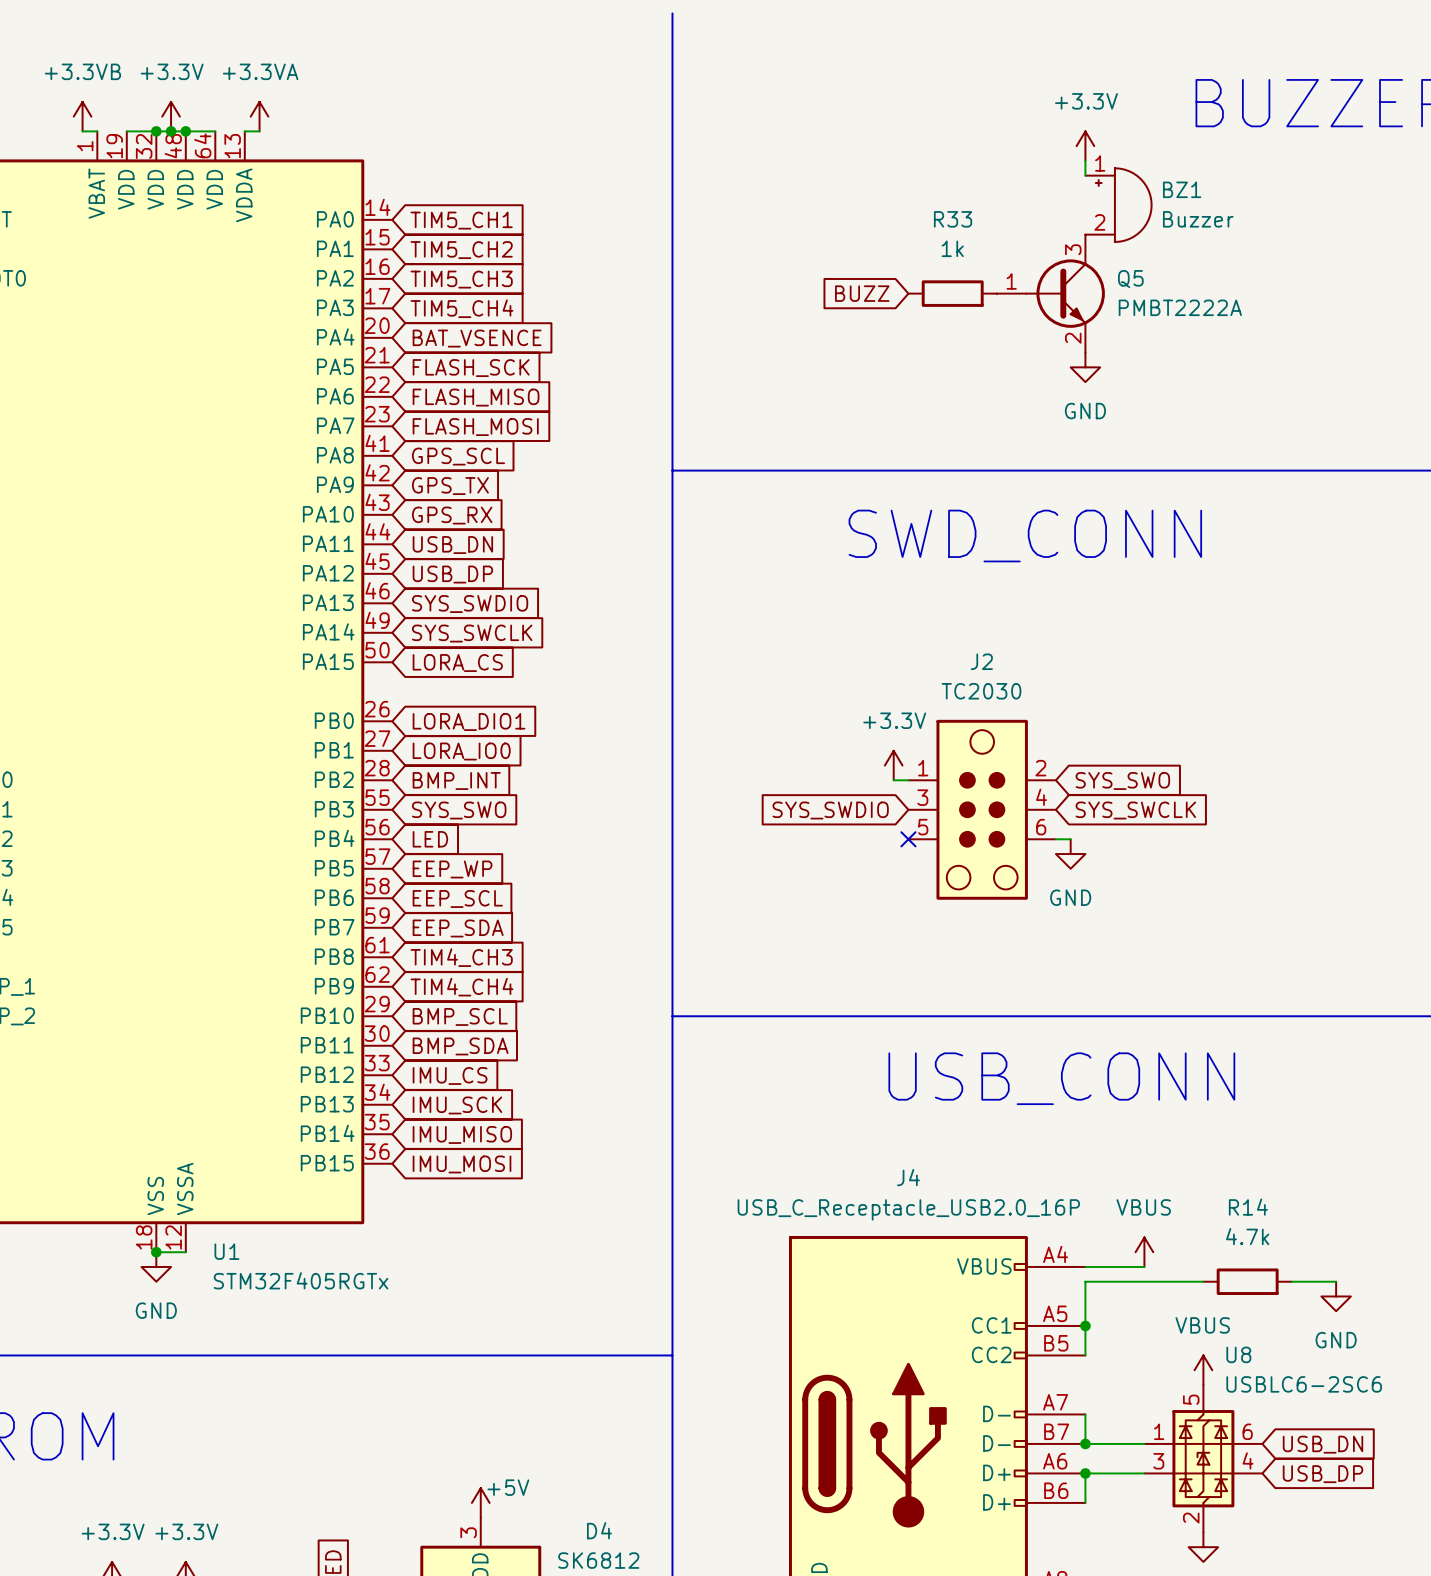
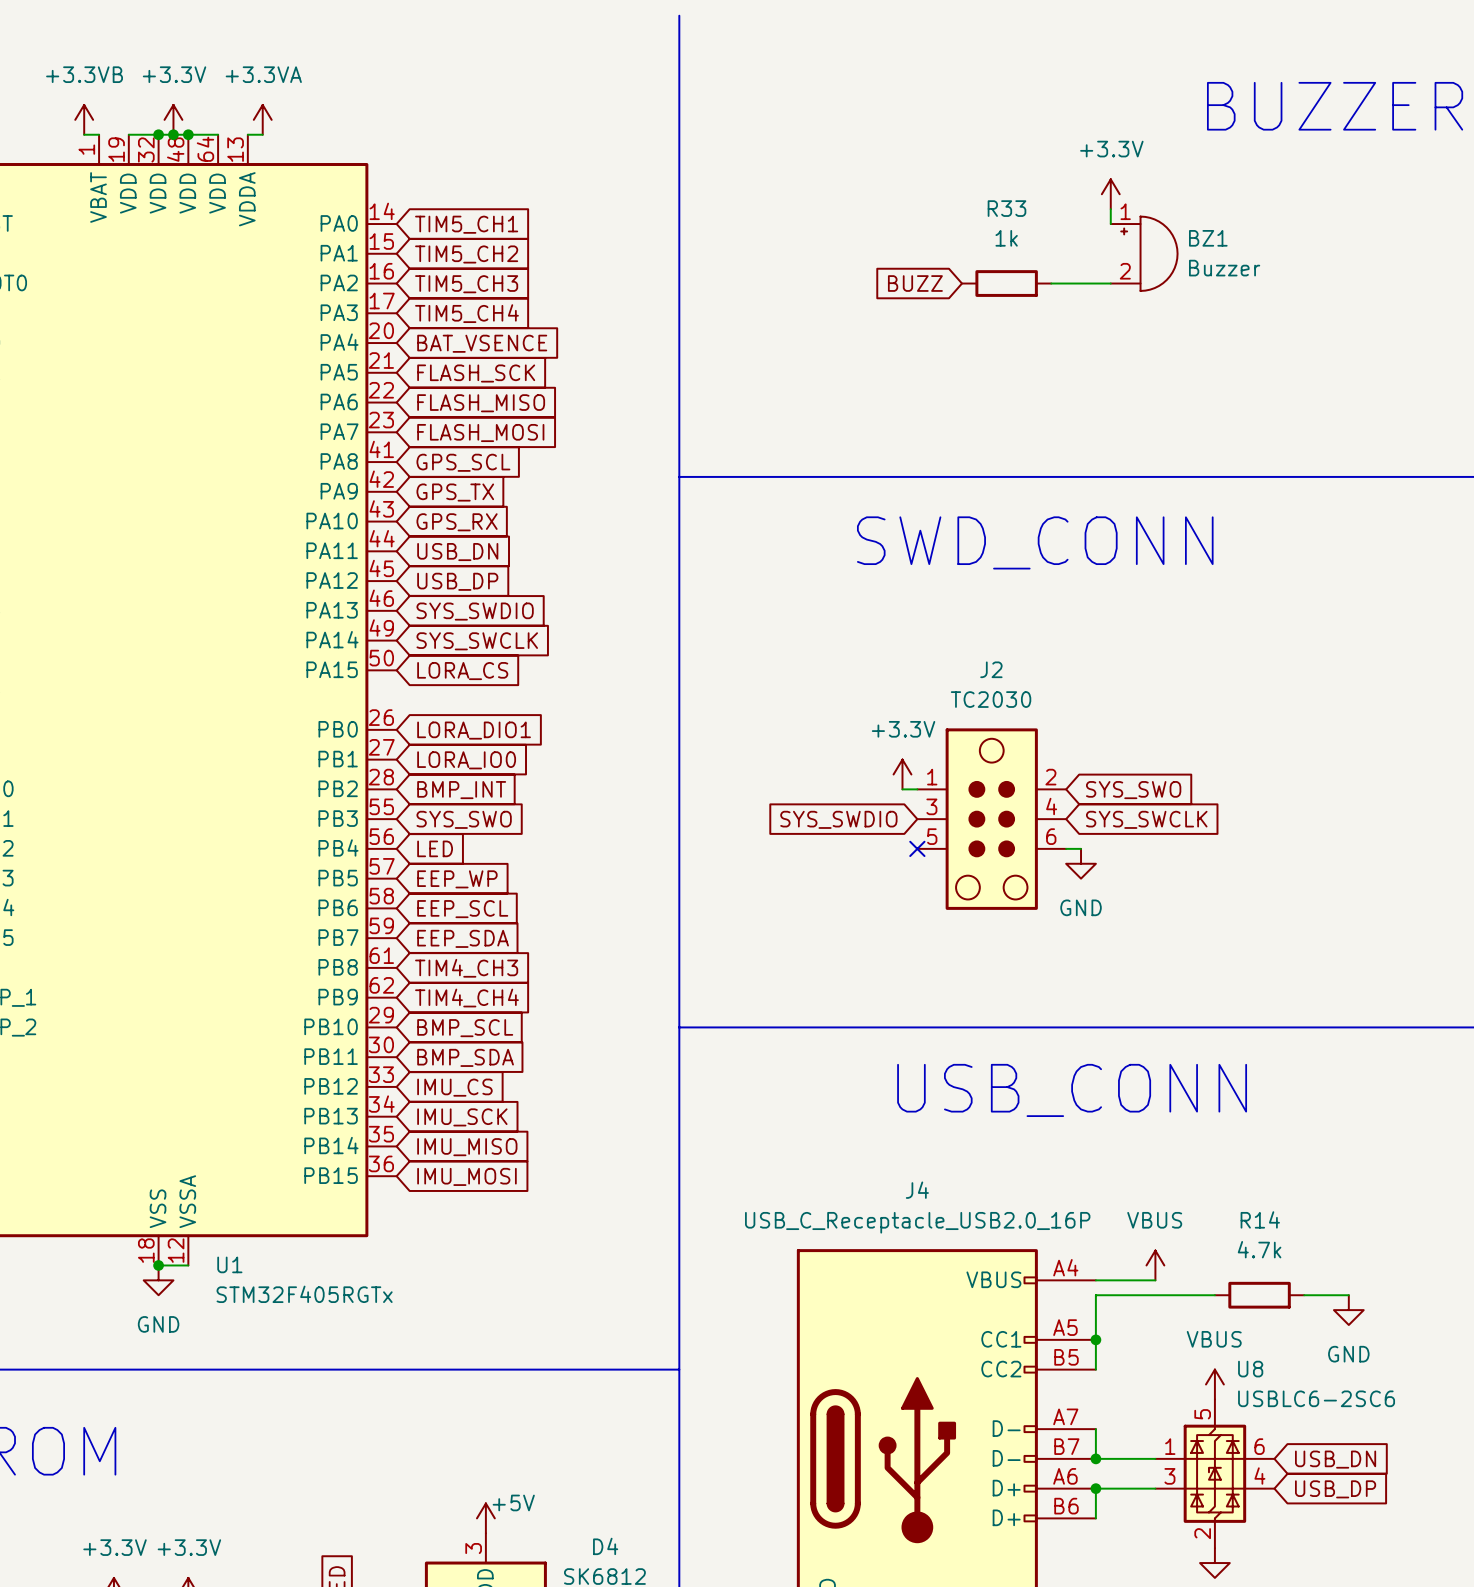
power symbol position: +3.3V (1085, 146) -> +3.3V (1110, 194)
wire: (1085, 160) (1085, 175) -> (1110, 209) (1110, 224)
BZ1 position: (1118, 205) -> (1144, 253)
wire: none -> (1051, 283) (1110, 283)
global label position: BUZZ (862, 293) -> BUZZ (915, 283)
R33 position: (952, 293) -> (1006, 283)
Q5: PMBT2222A (1050, 293) -> none
power symbol: GND (1085, 367) -> none

